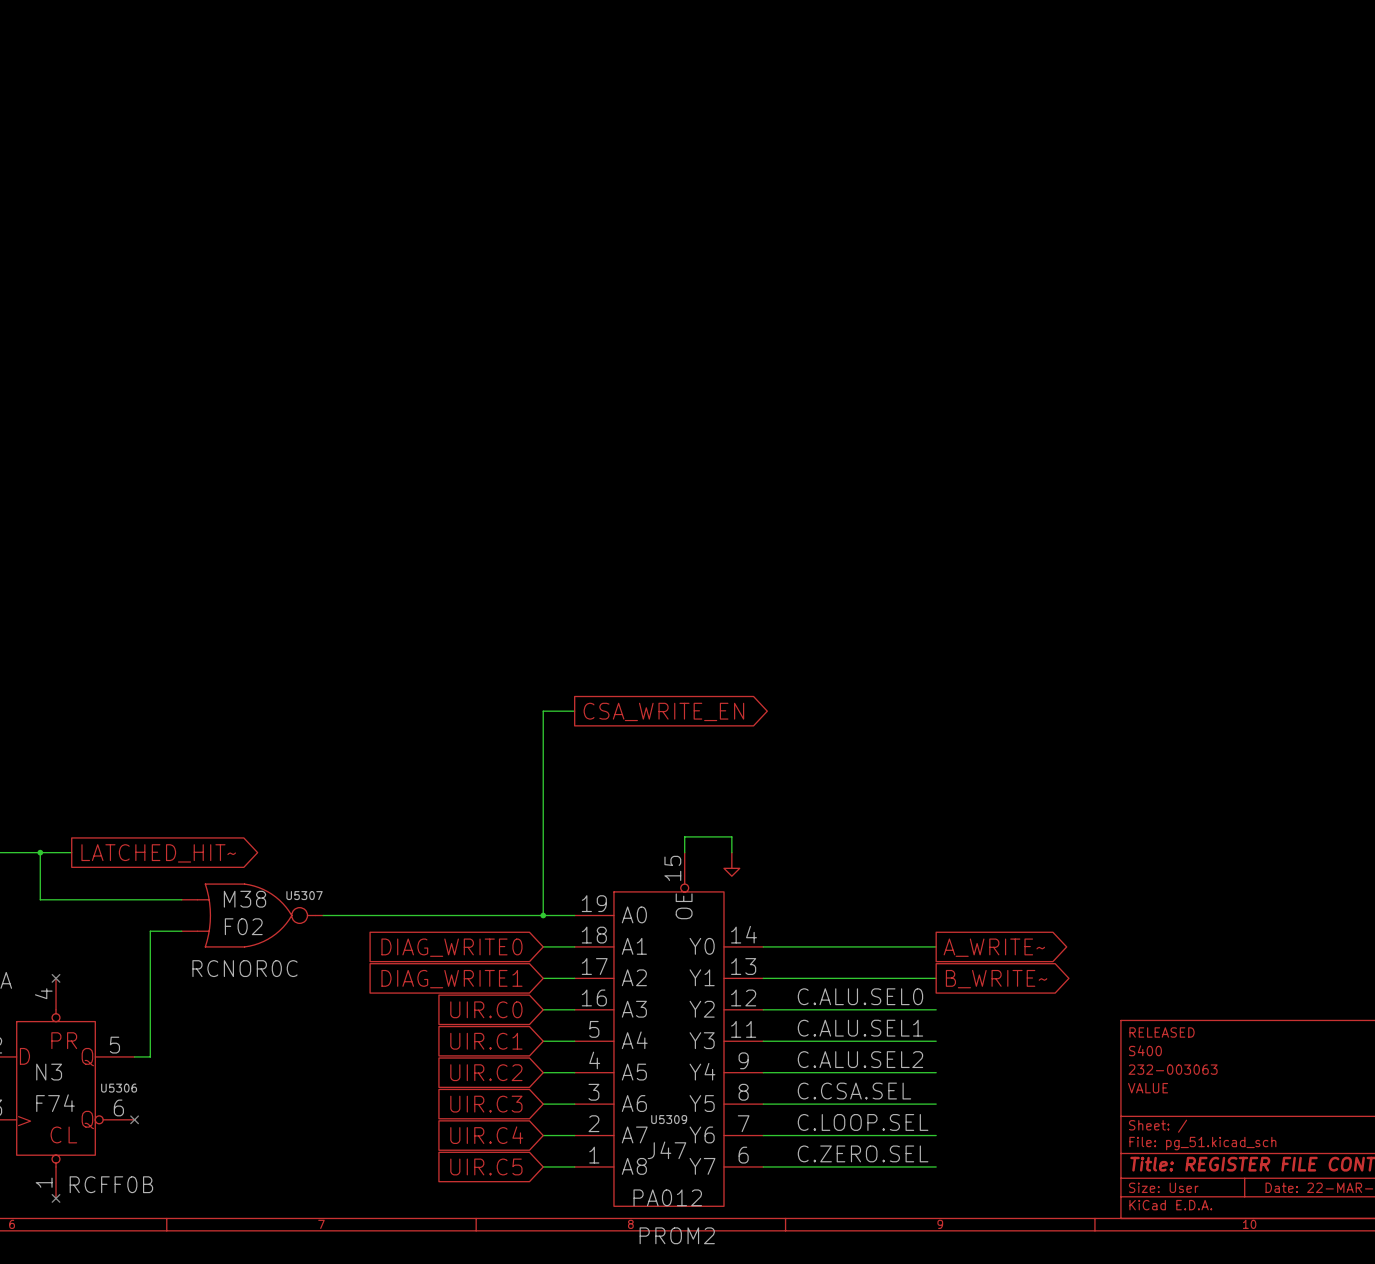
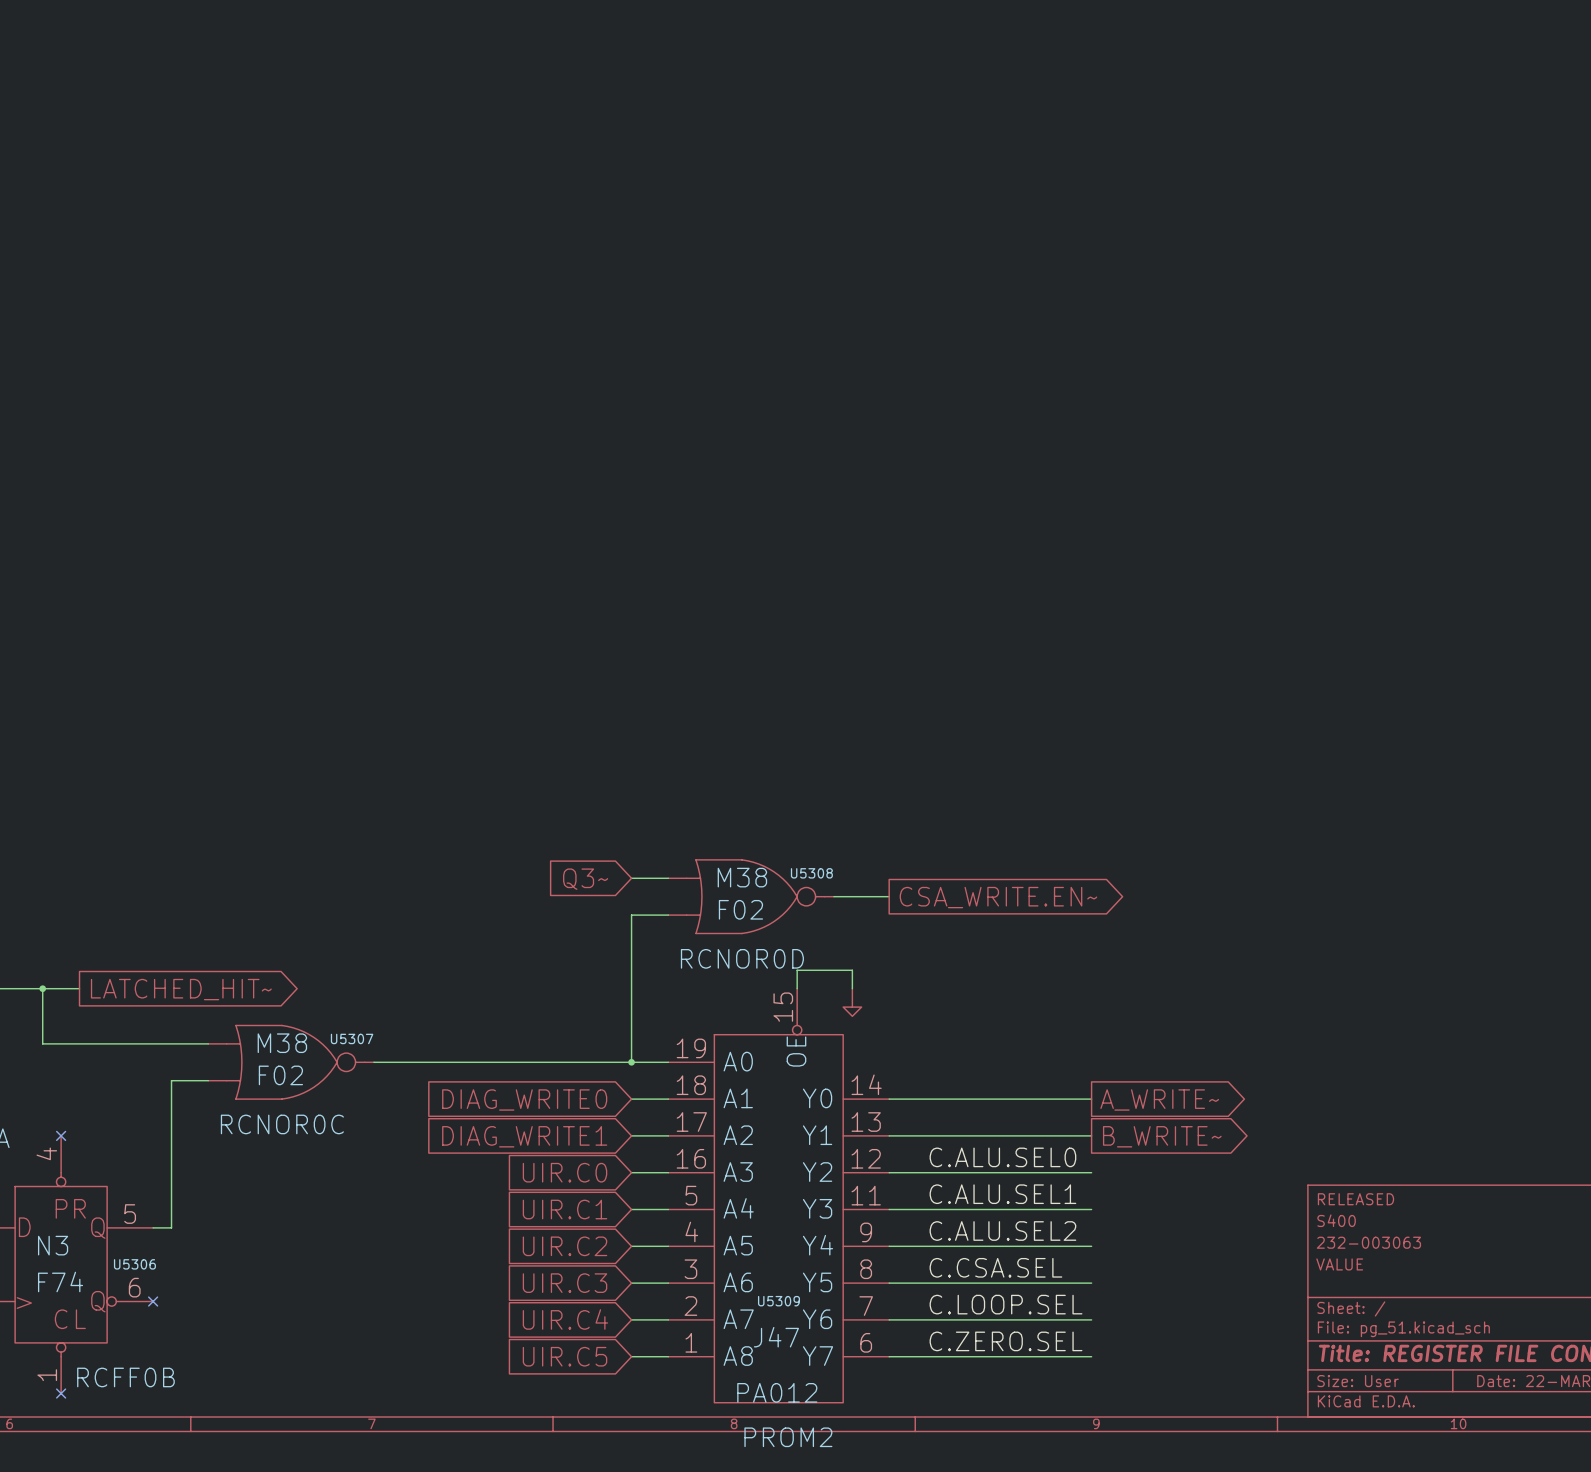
wire: (574, 711) (543, 711) (543, 789) -> (668, 915) (631, 915)
global label: CSA_WRITE_EN (663, 711) -> none
wire: none -> (631, 878) (668, 878)
global label: none -> Q3~ (585, 879)
U5308: none -> F02 (751, 896)
wire: none -> (833, 896) (889, 896)
global label: none -> CSA_WRITE.EN~ (998, 897)

